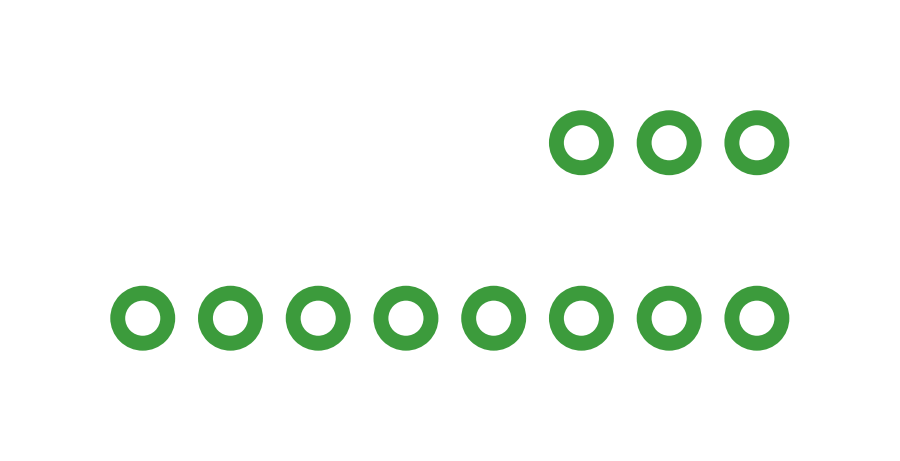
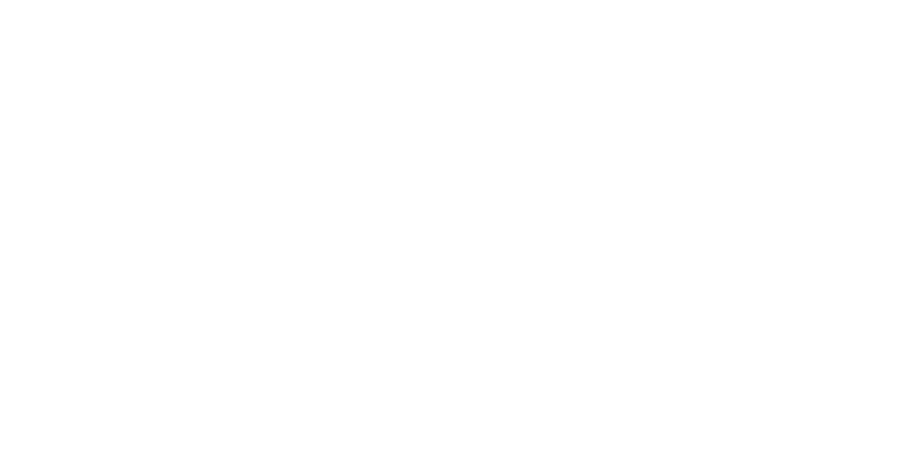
part: (669, 142) -> none
part: (449, 318) -> none

